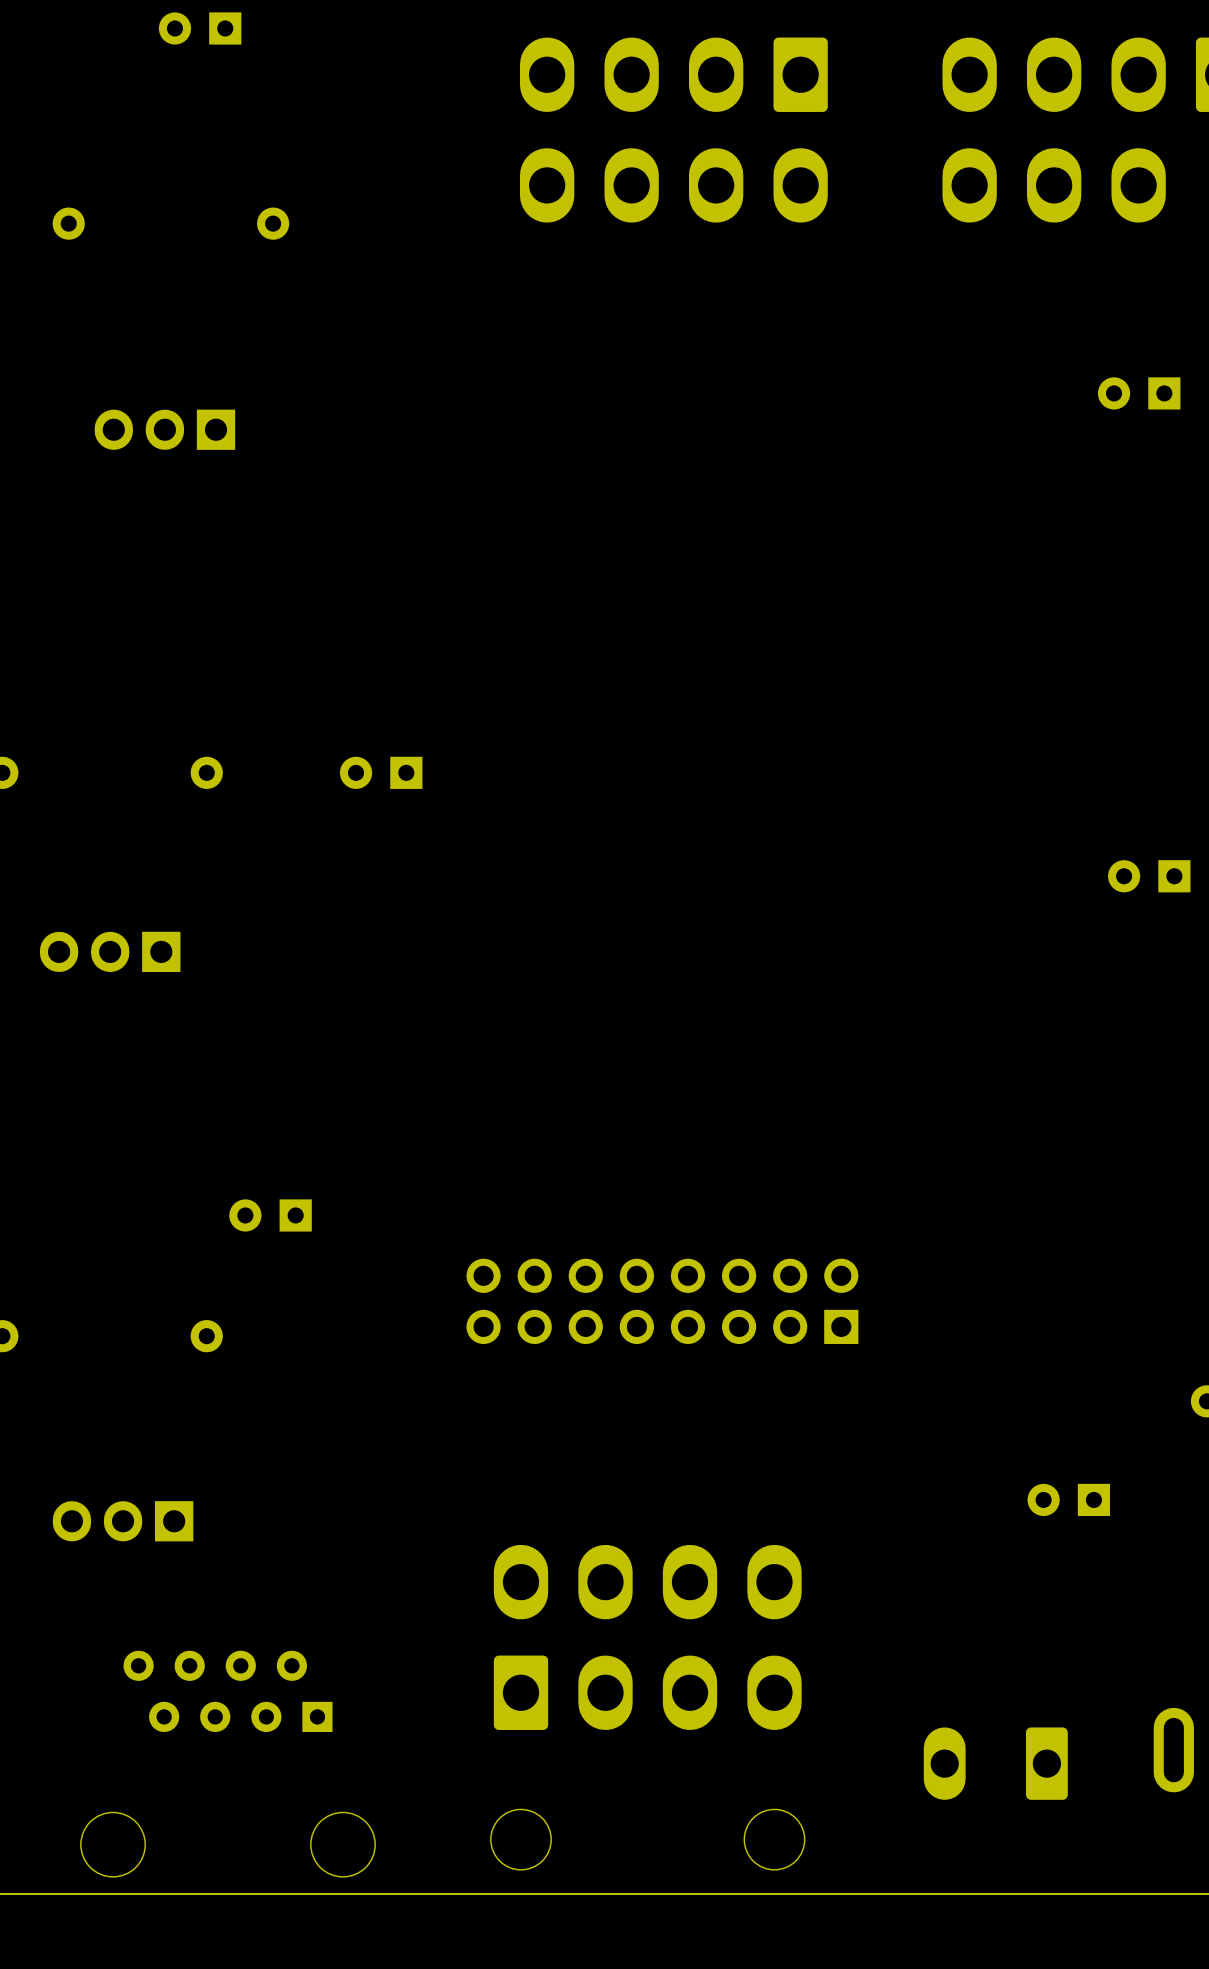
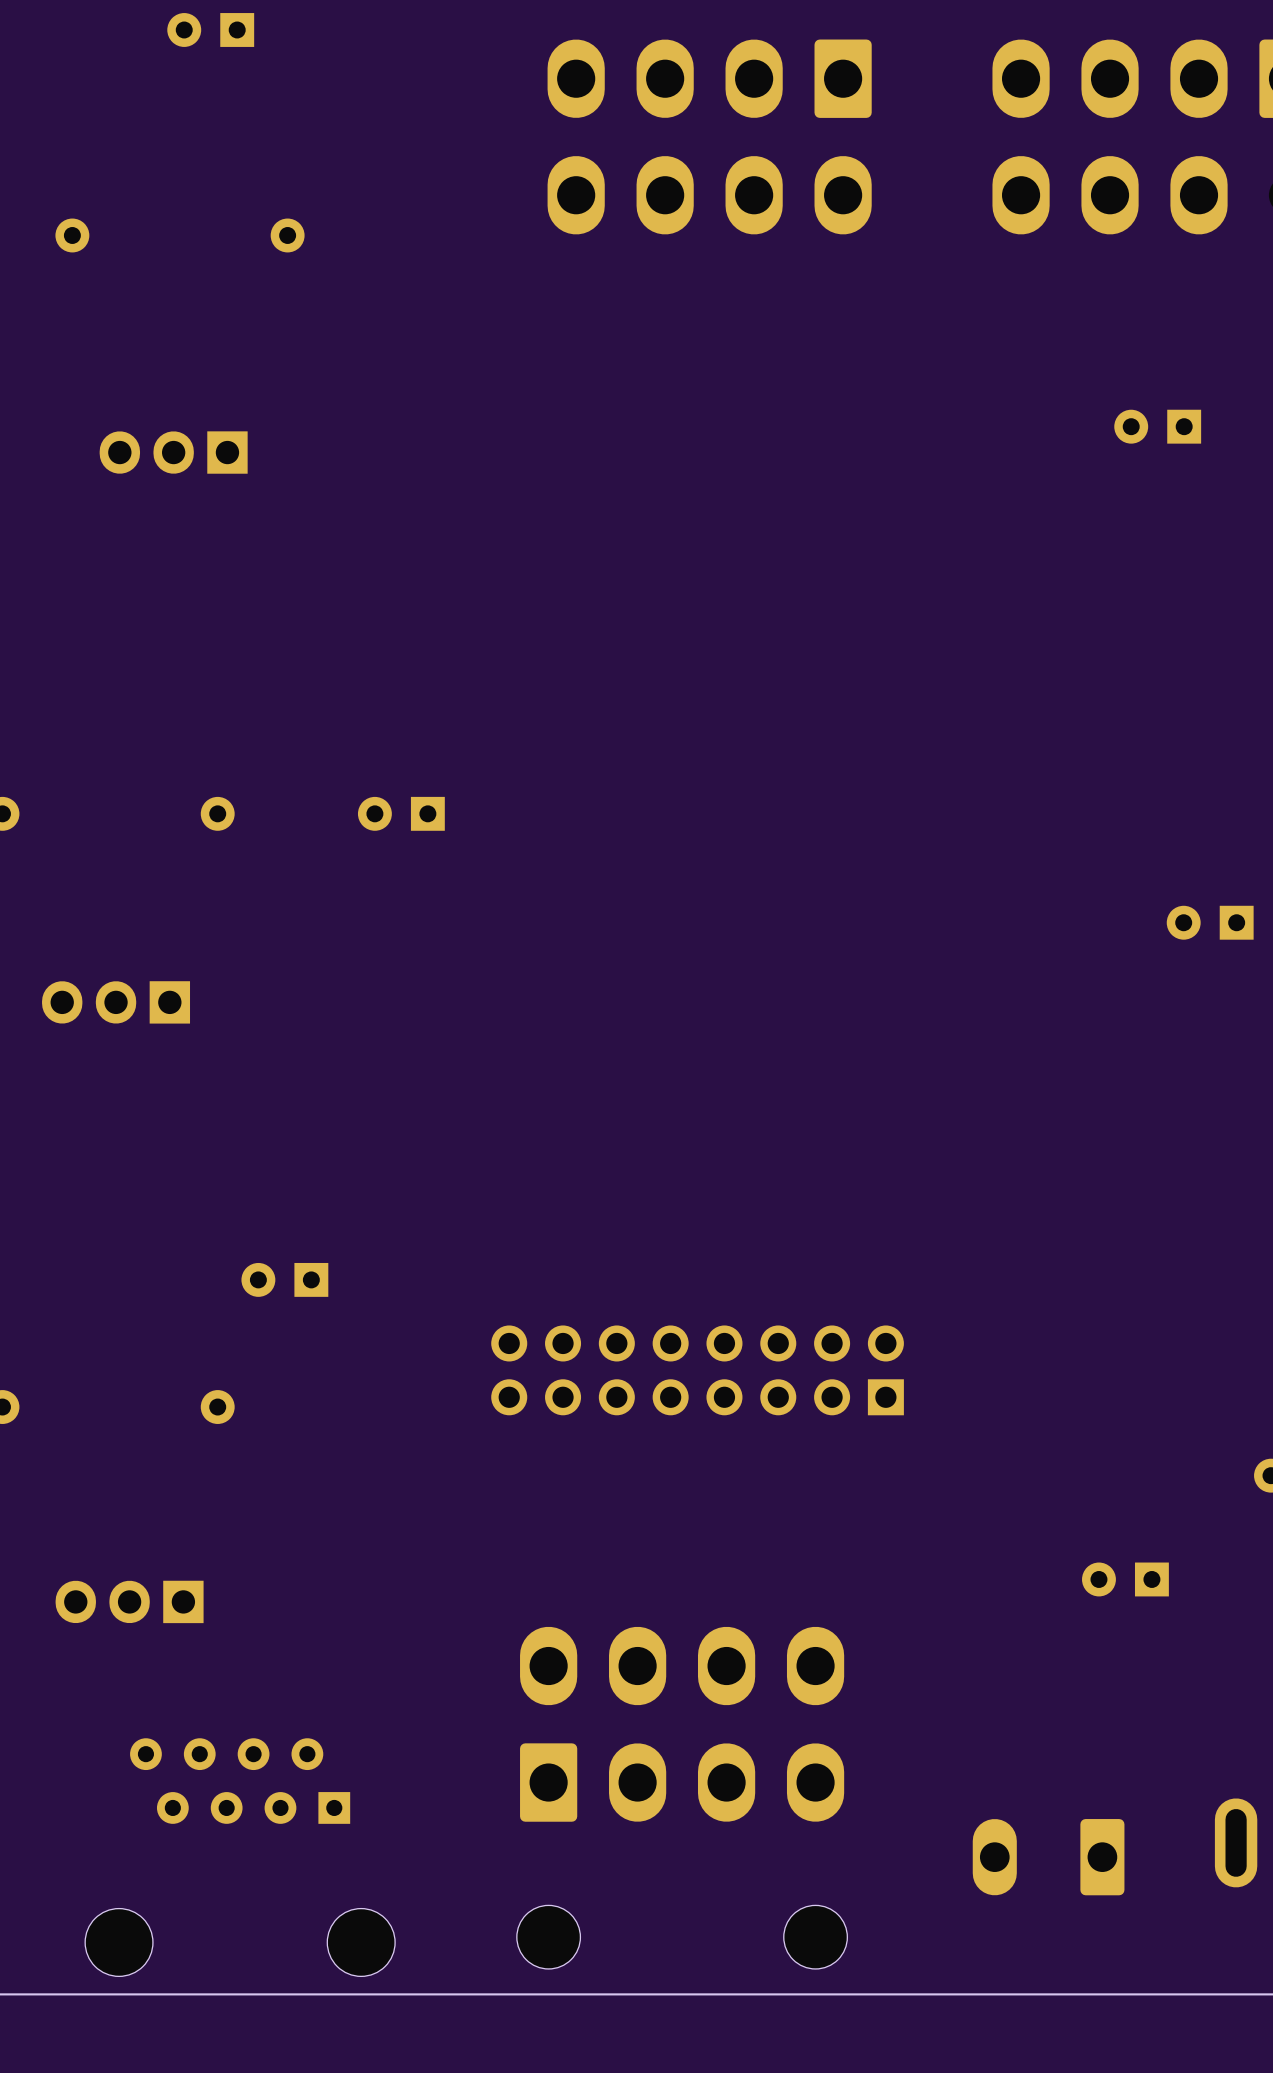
part position: (1139, 393) -> (1157, 426)

